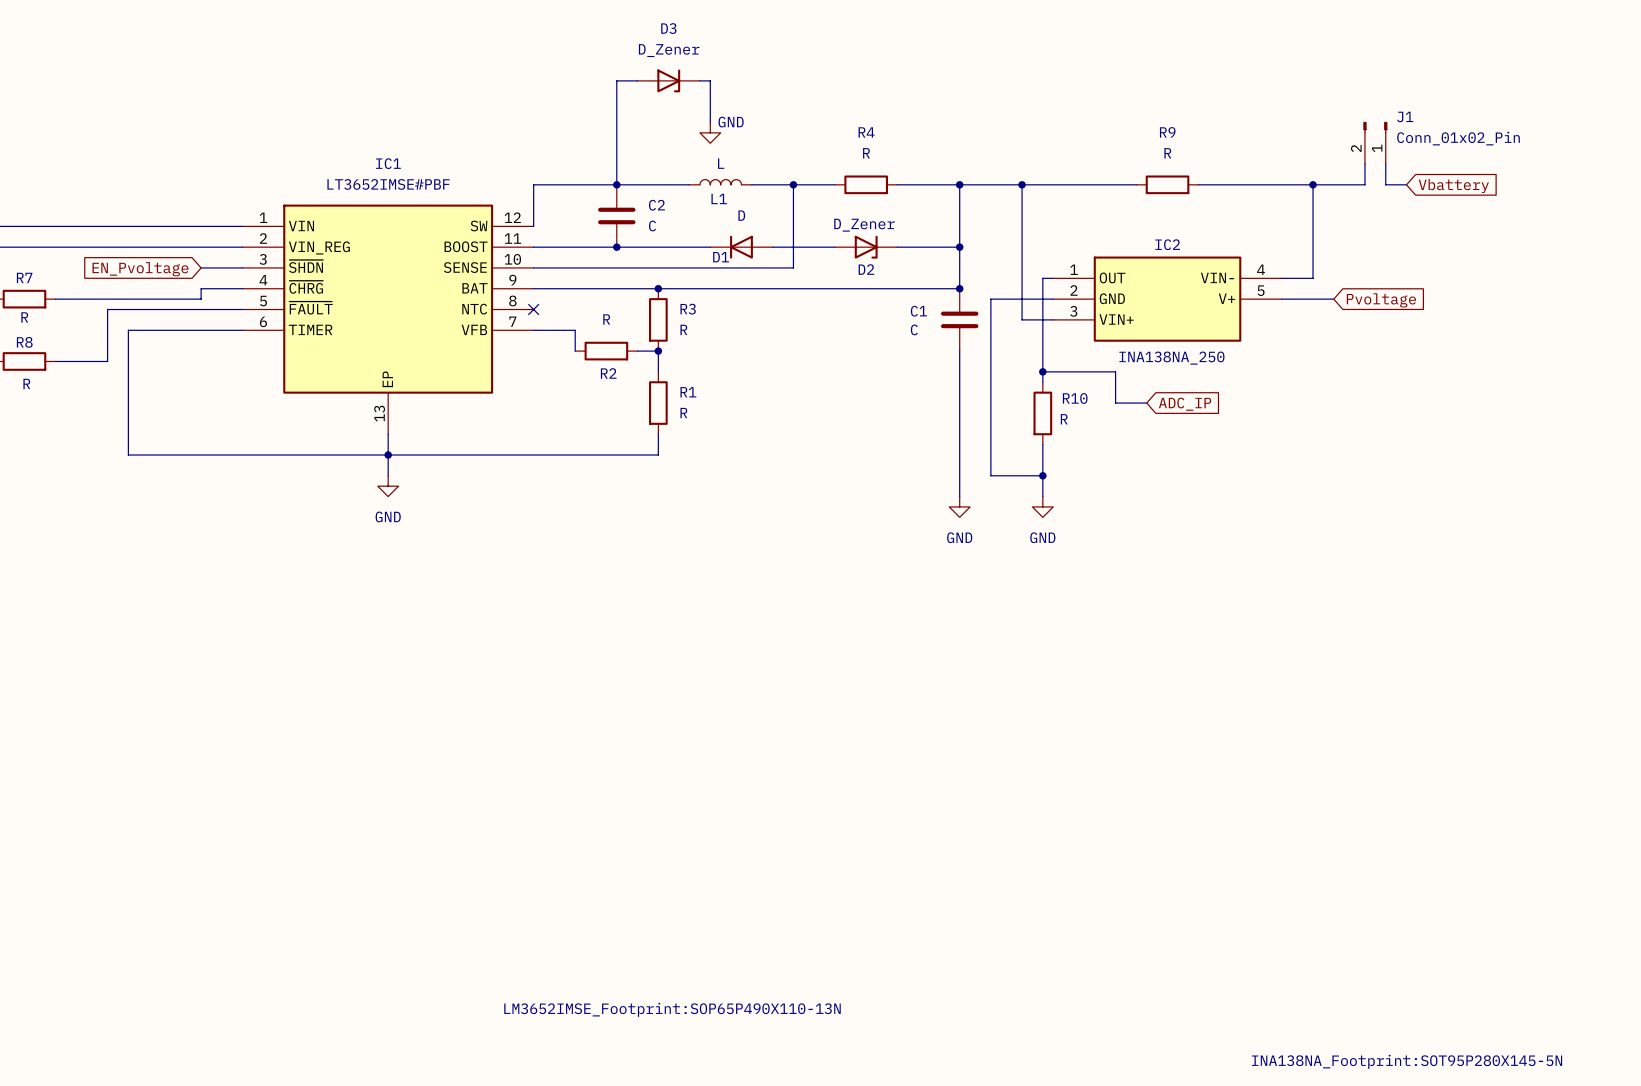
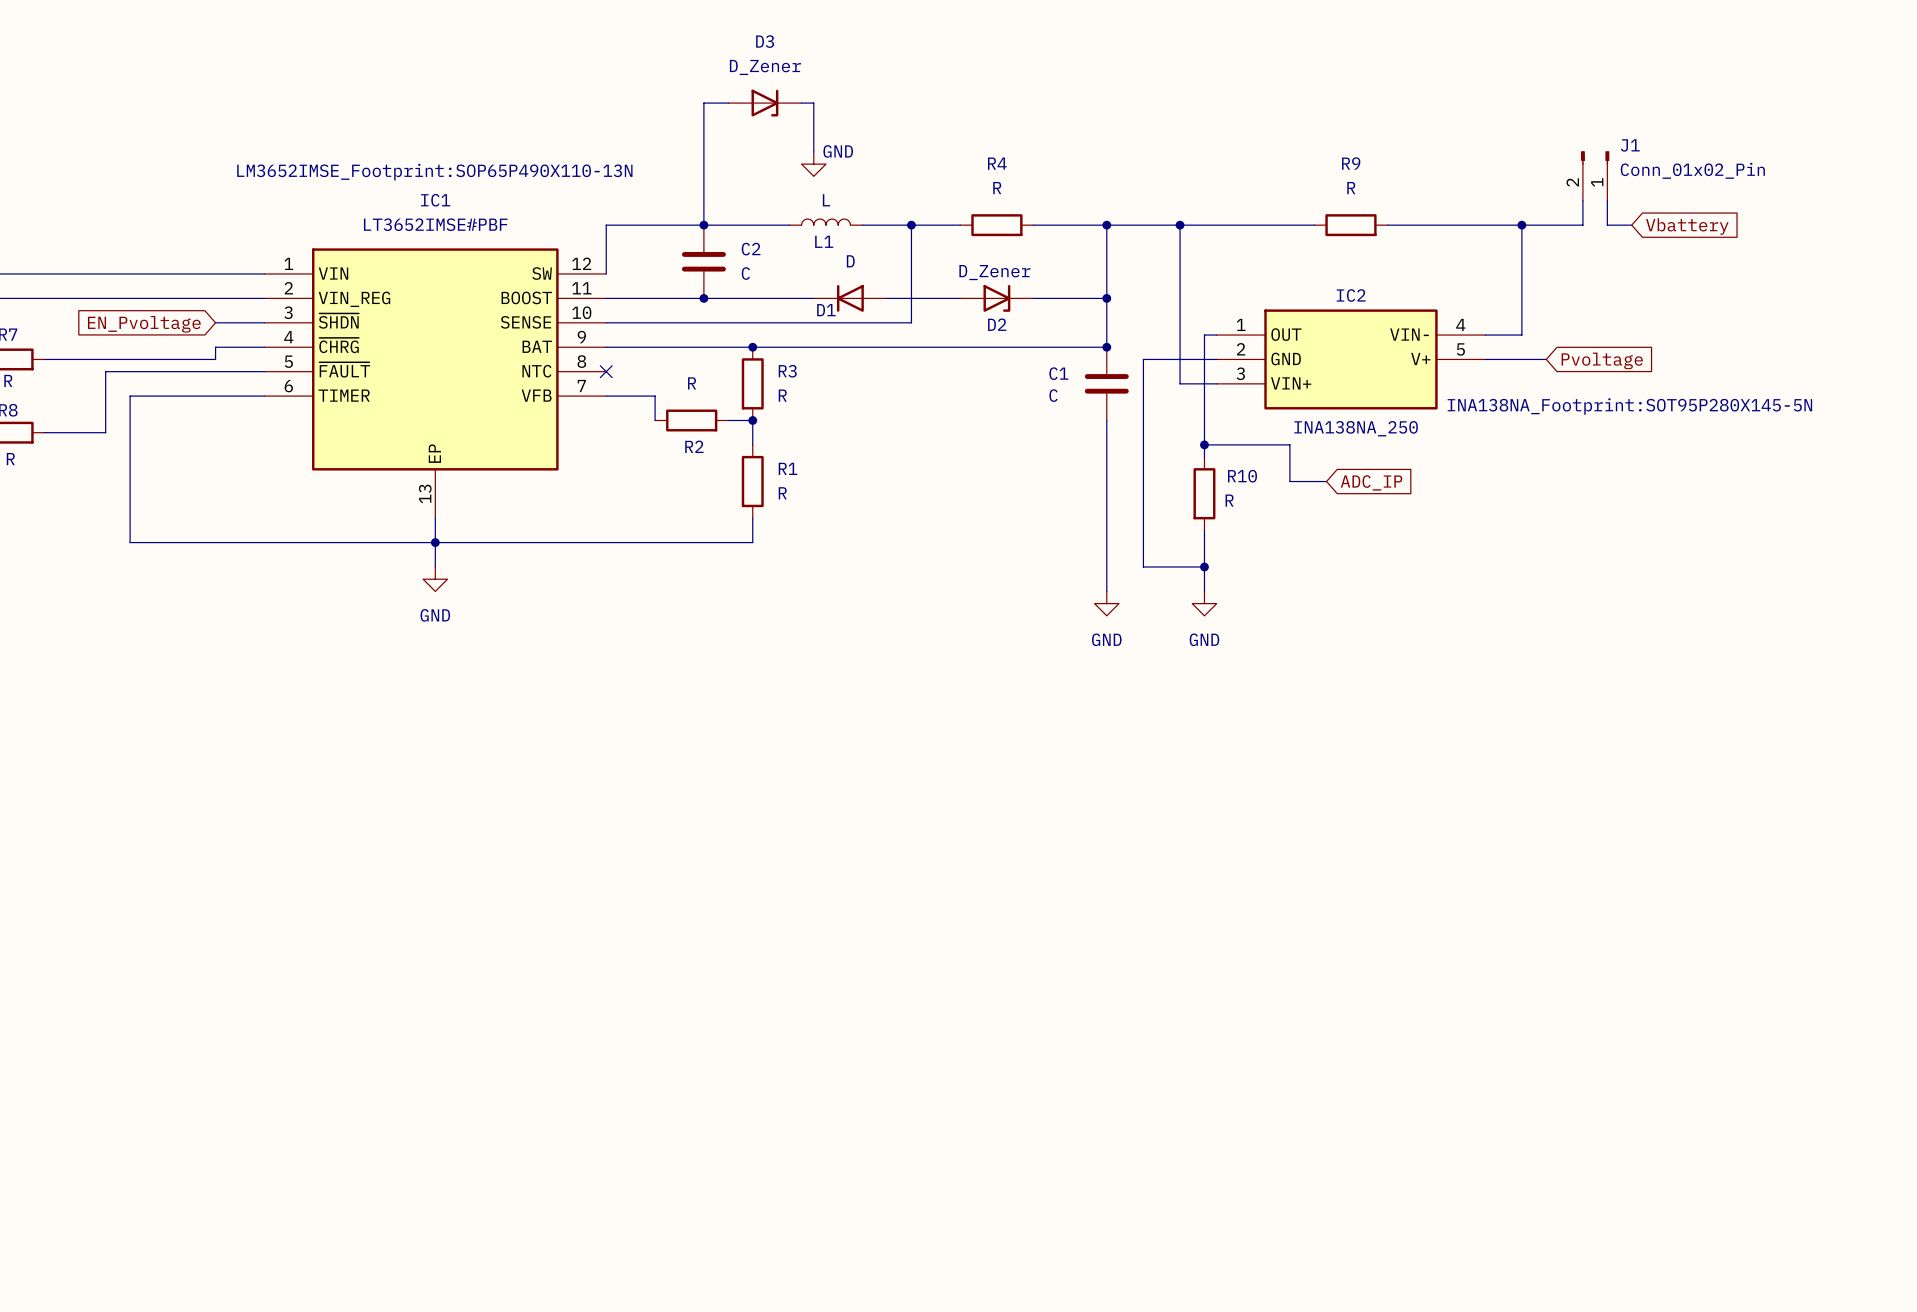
IC1 text position: LM3652IMSE_Footprint:SOP65P490X110-13N (672, 1009) -> LM3652IMSE_Footprint:SOP65P490X110-13N (434, 172)
IC2 text position: INA138NA_Footprint:SOT95P280X145-5N (1407, 1061) -> INA138NA_Footprint:SOT95P280X145-5N (1629, 406)

